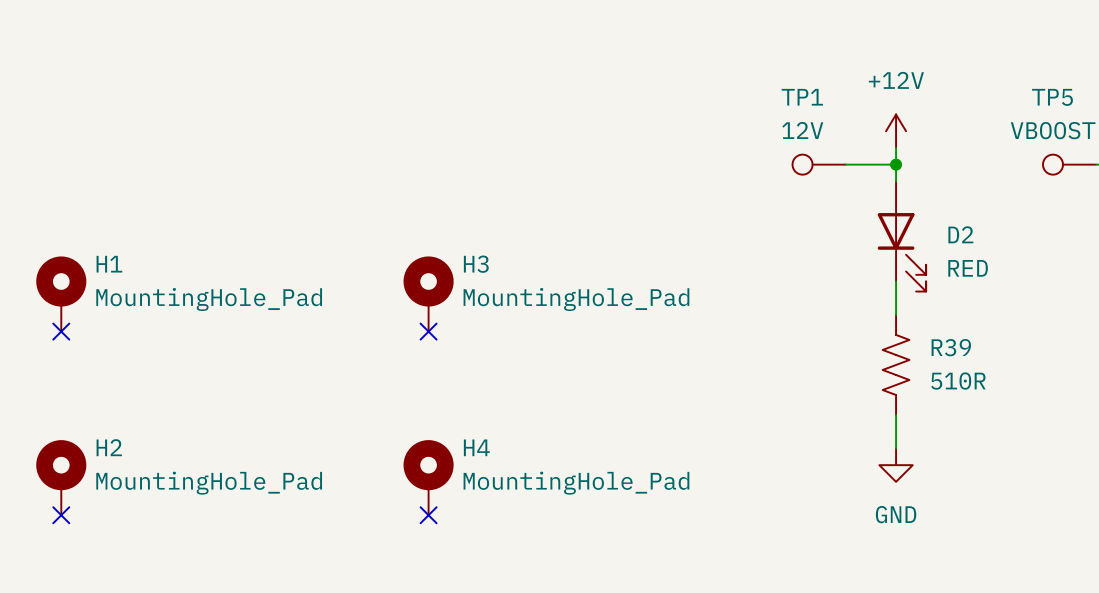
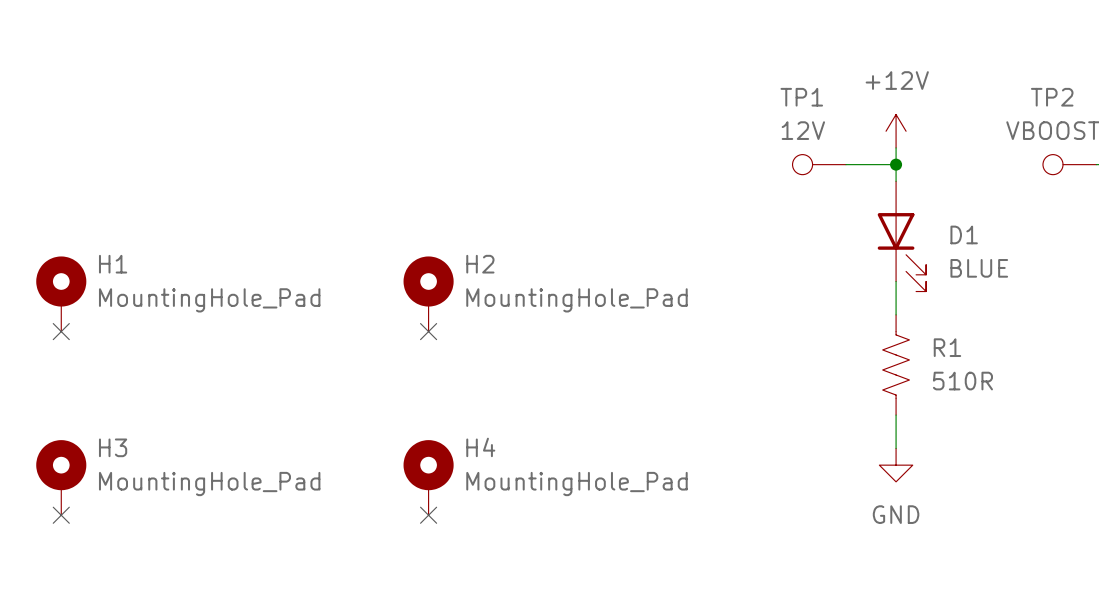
TP5 name: TP5 (1052, 97) -> TP2 (1052, 97)
D2 name: D2 (960, 234) -> D1 (964, 234)
H3 name: H3 (476, 264) -> H2 (480, 264)
D2 value: RED (968, 268) -> BLUE (979, 268)
R39 name: R39 (951, 347) -> R1 (947, 347)
H2 name: H2 (109, 447) -> H3 (113, 447)

